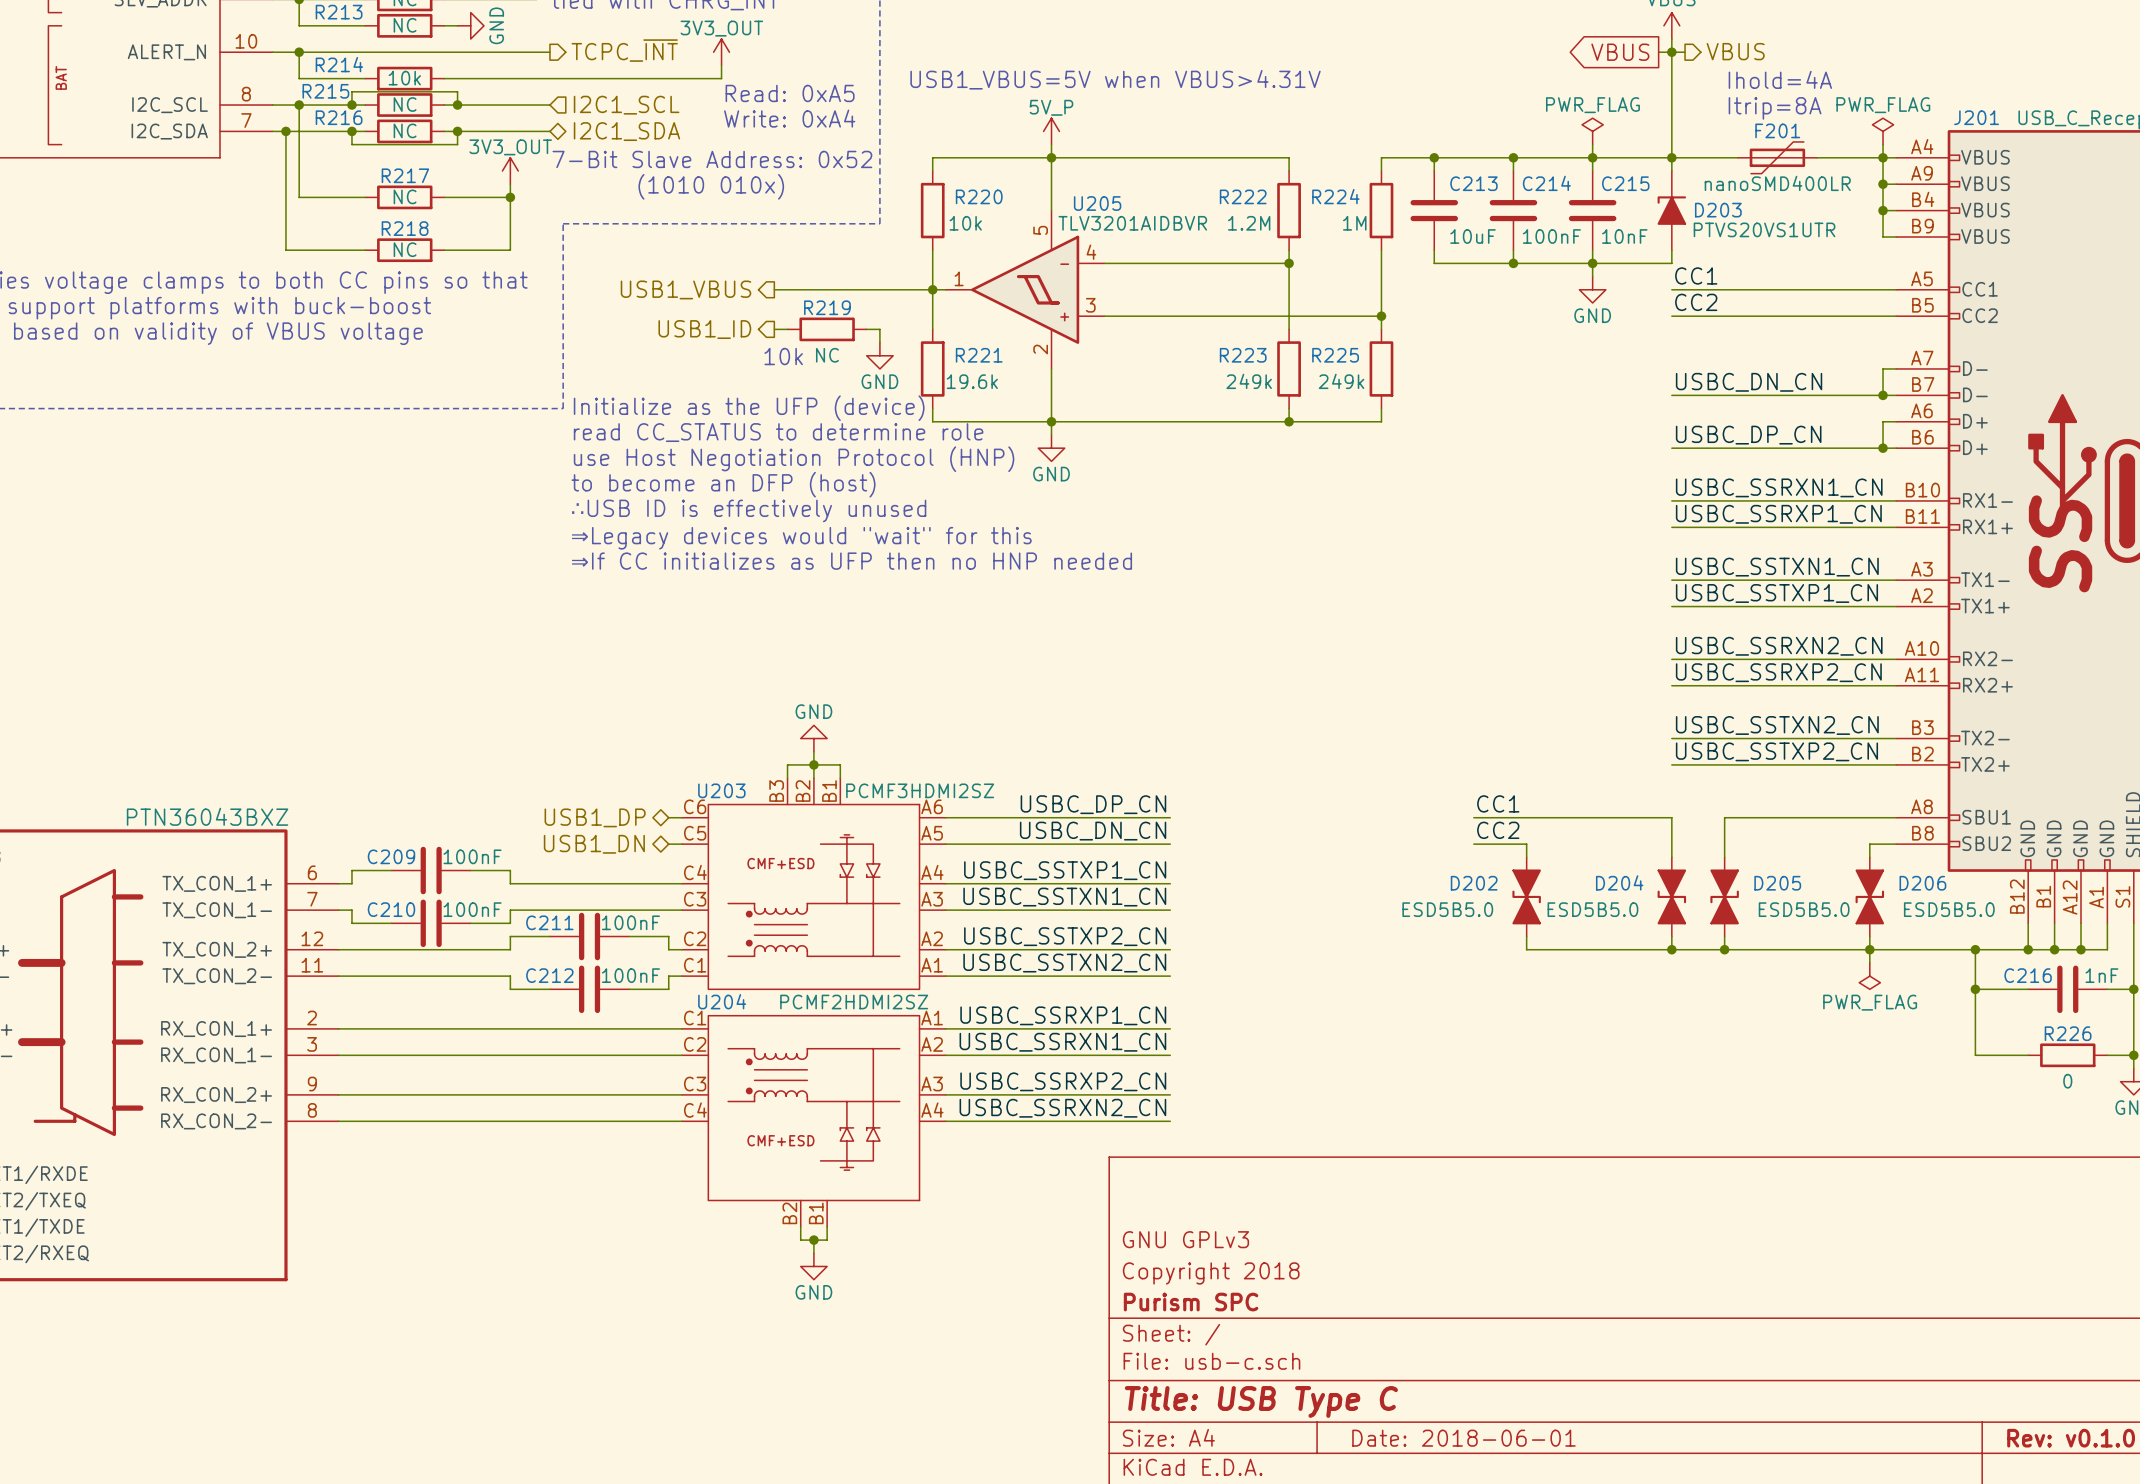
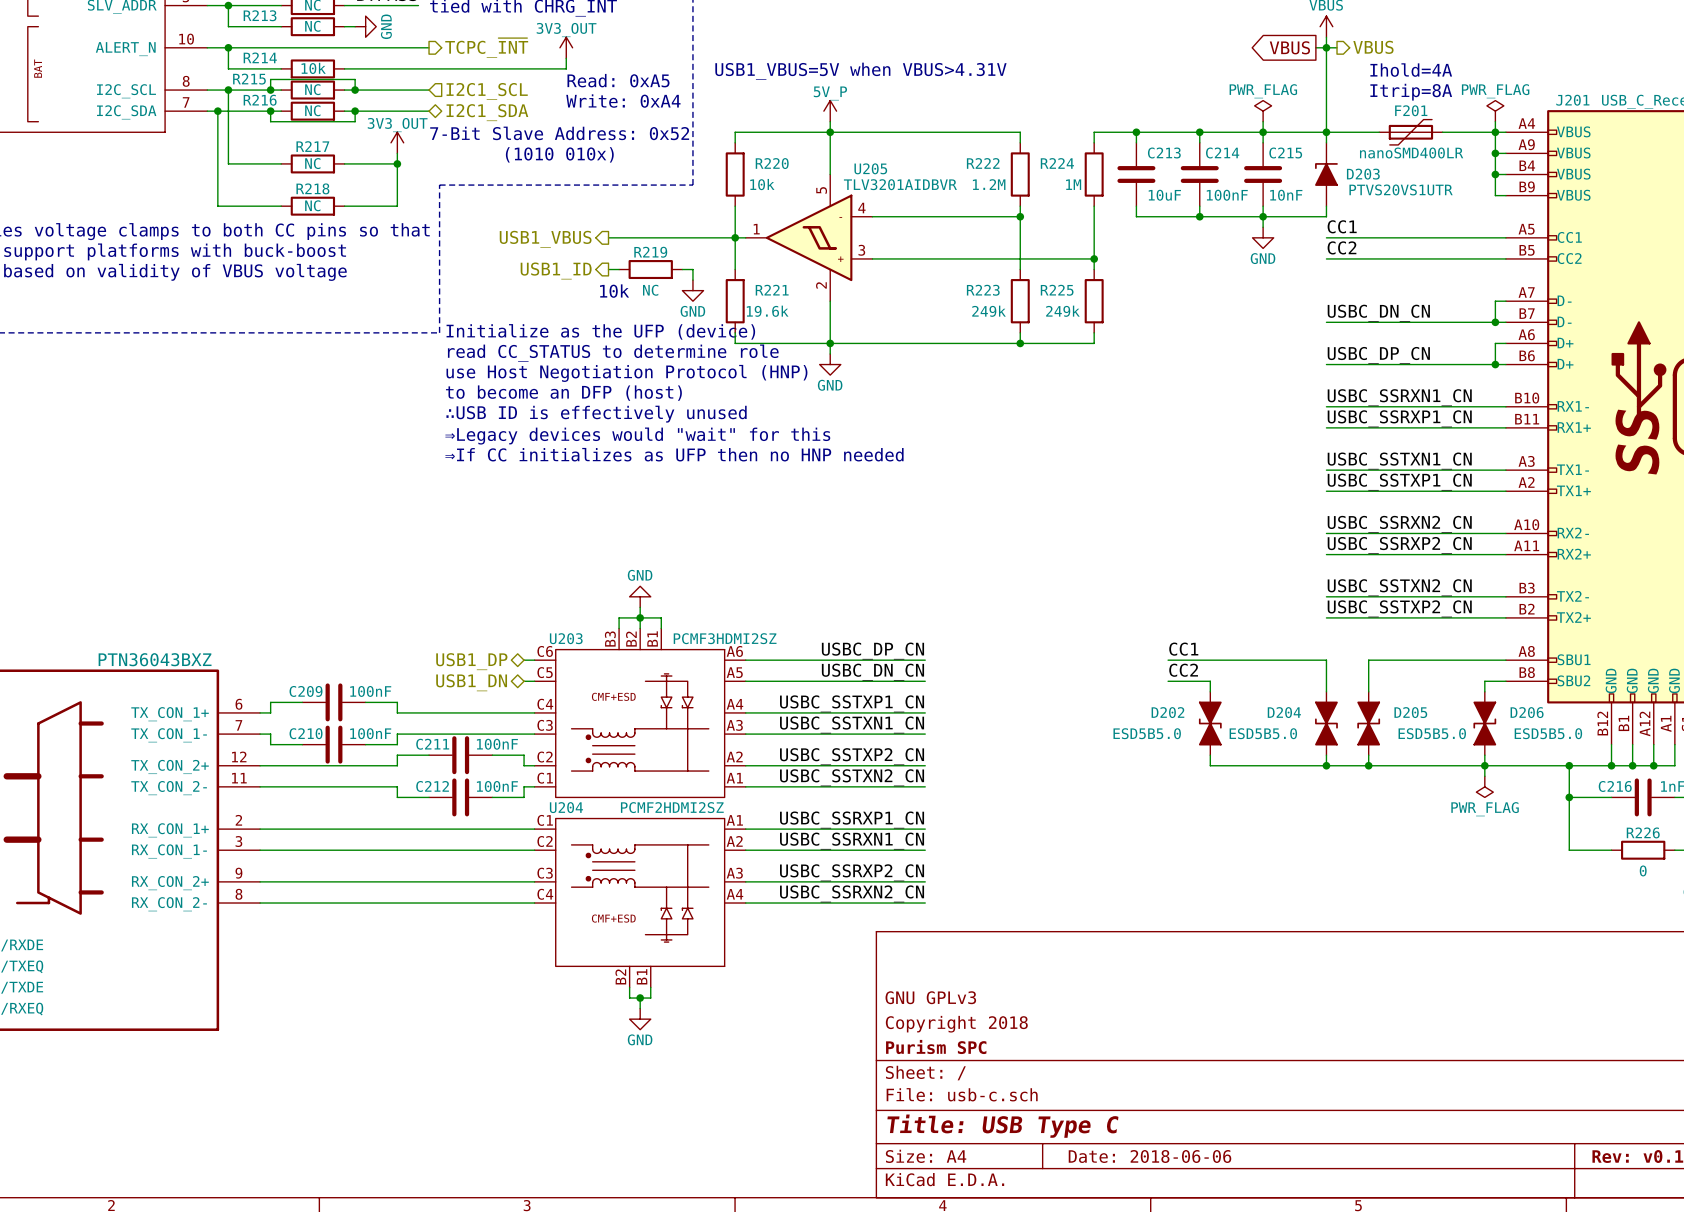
title block: Date: 2018-06-01 (1463, 1438) -> Date: 2018-06-06 (1149, 1156)

